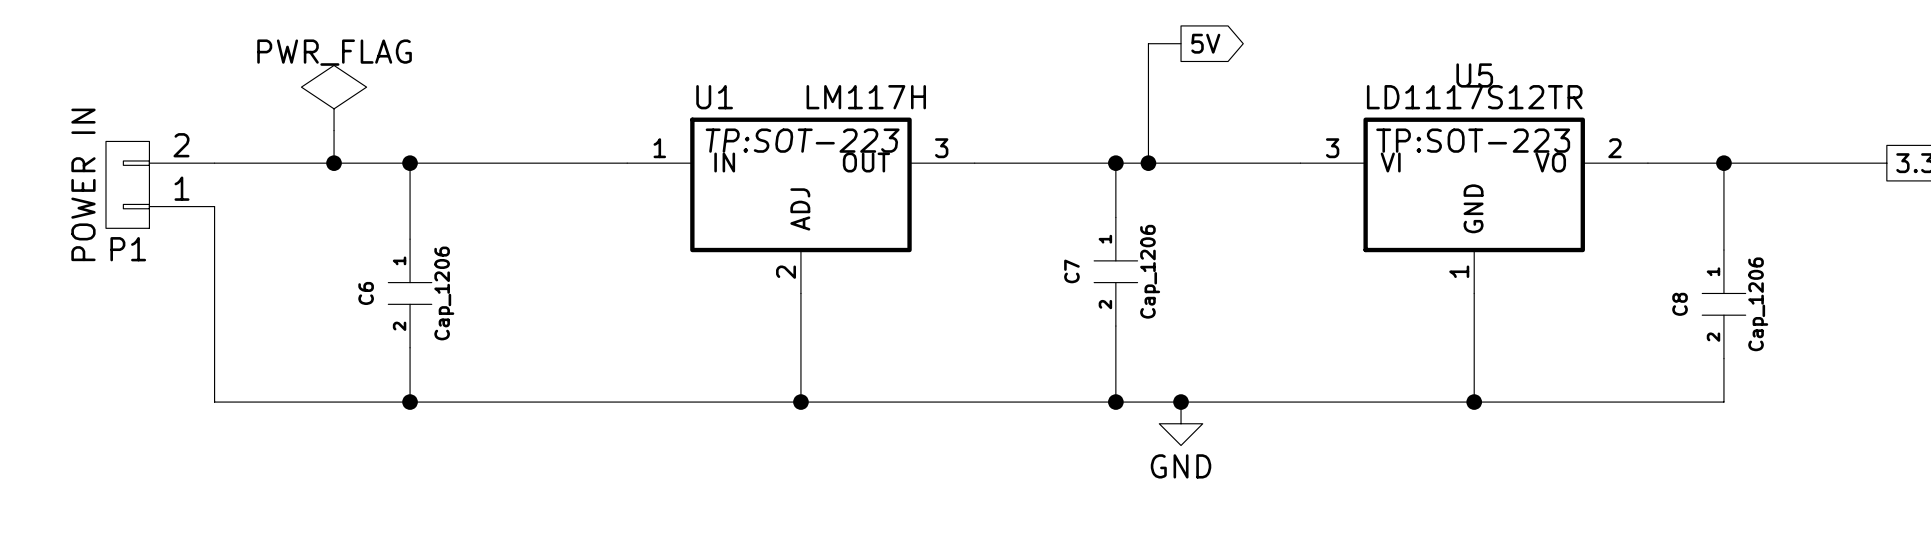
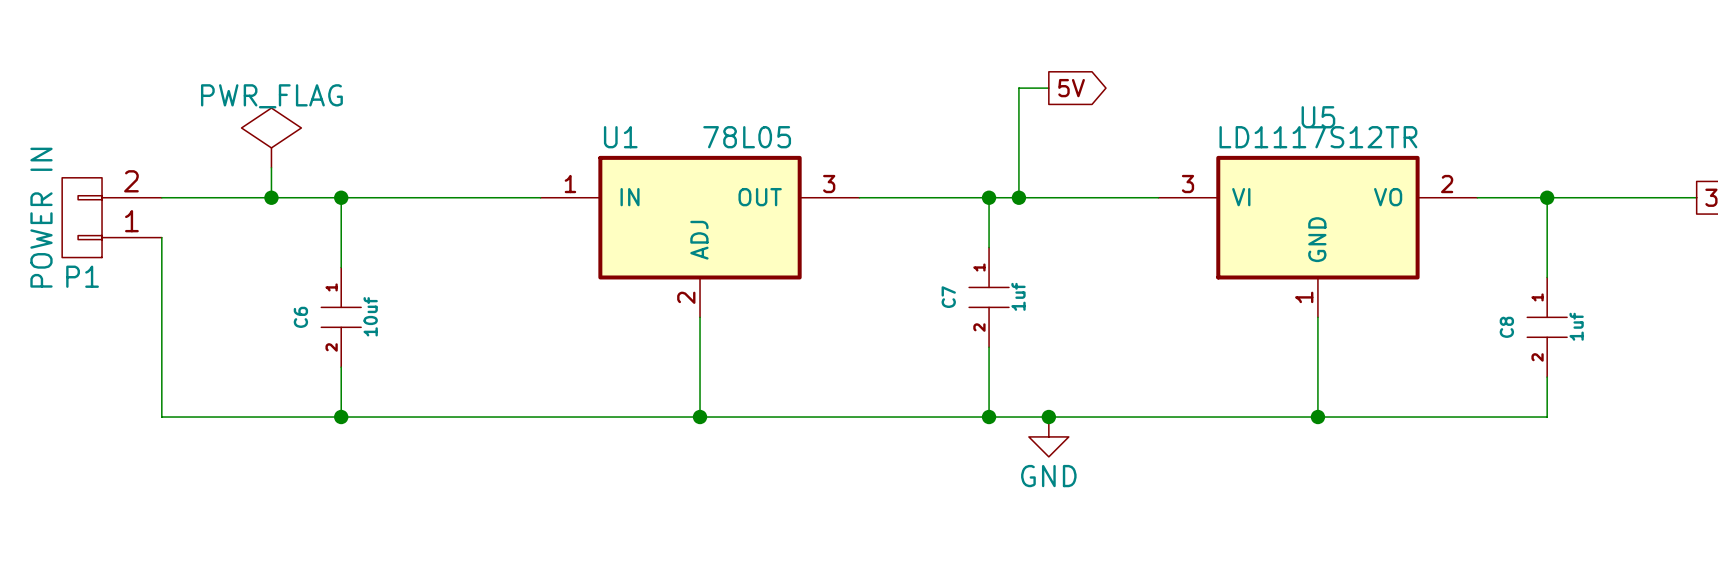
U1 value: LM117H (866, 97) -> 78L05 (747, 137)
U1 text: TP:SOT-223 (802, 140) -> none
U5 text: TP:SOT-223 (1473, 140) -> none
C7 value: Cap_1206 (1150, 271) -> 1uf (1018, 296)
C6 value: Cap_1206 (444, 293) -> 10uf (370, 316)
C8 value: Cap_1206 (1758, 304) -> 1uf (1576, 326)

